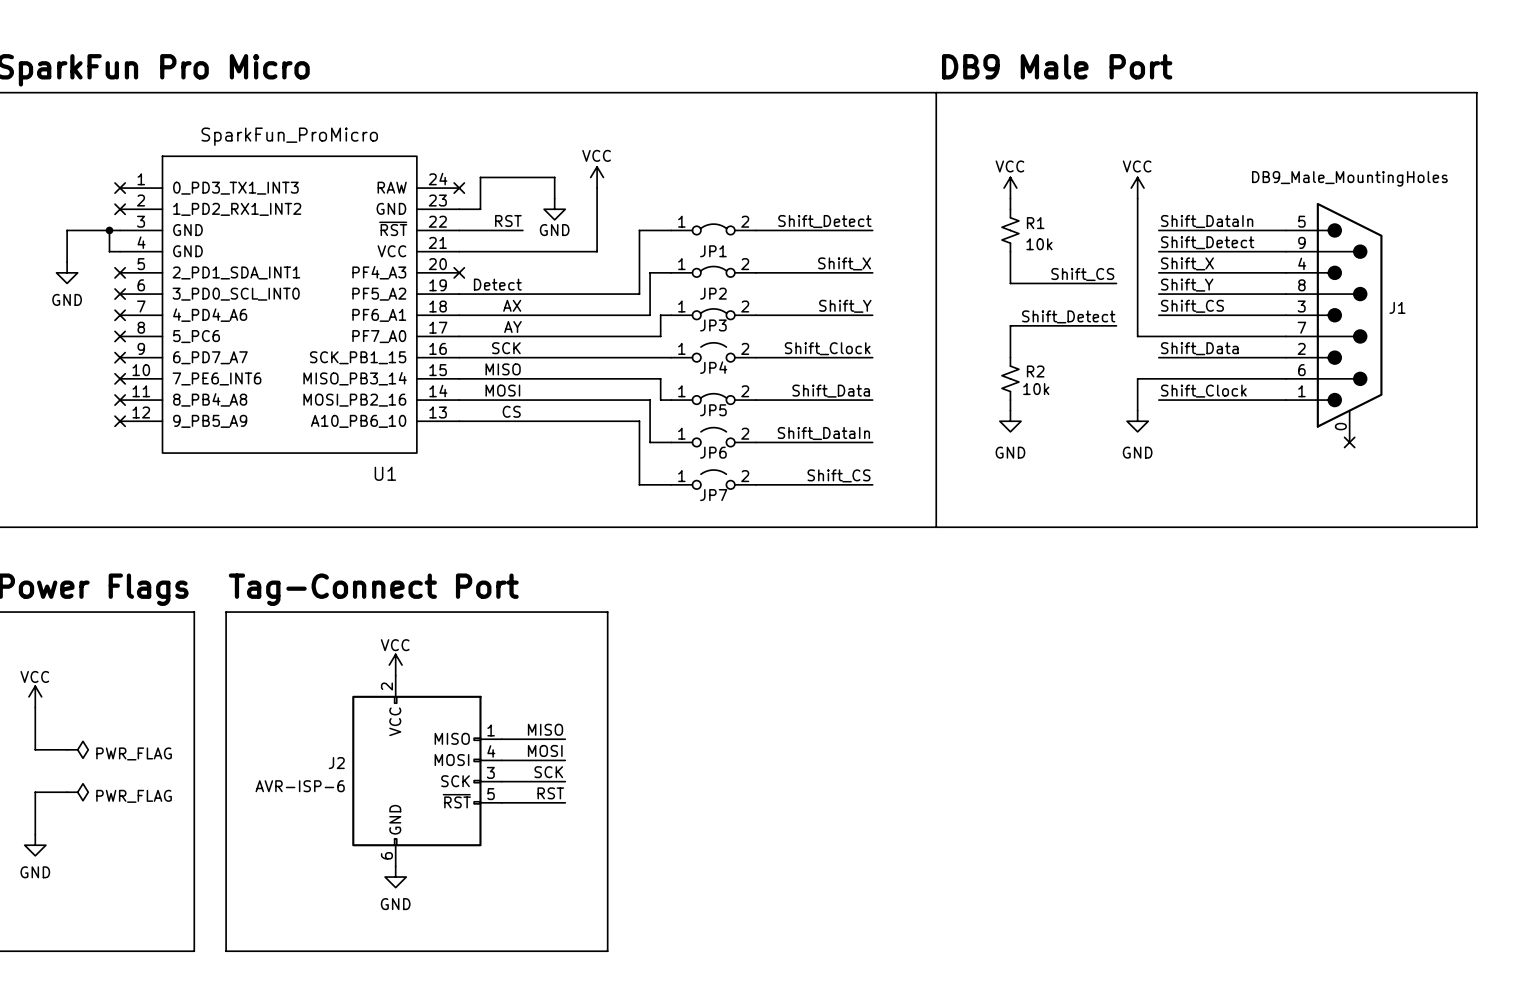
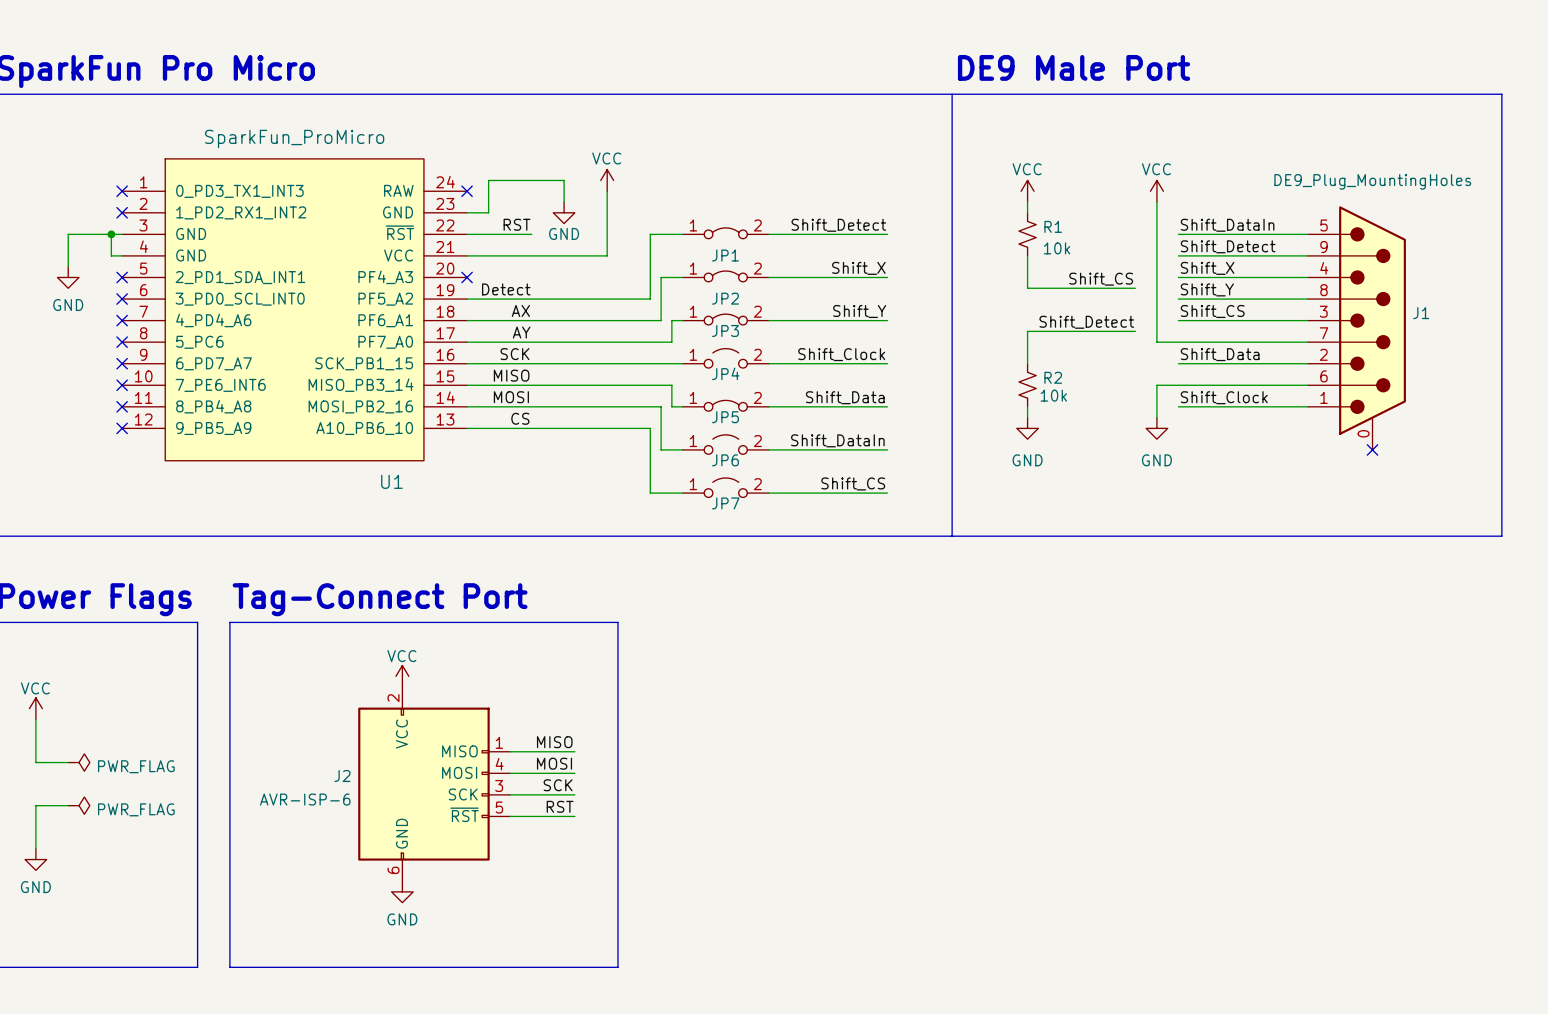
text: DB9 Male Port (1057, 66) -> DE9 Male Port (1074, 67)
J1 value: DB9_Male_MountingHoles (1349, 178) -> DE9_Plug_MountingHoles (1372, 181)

